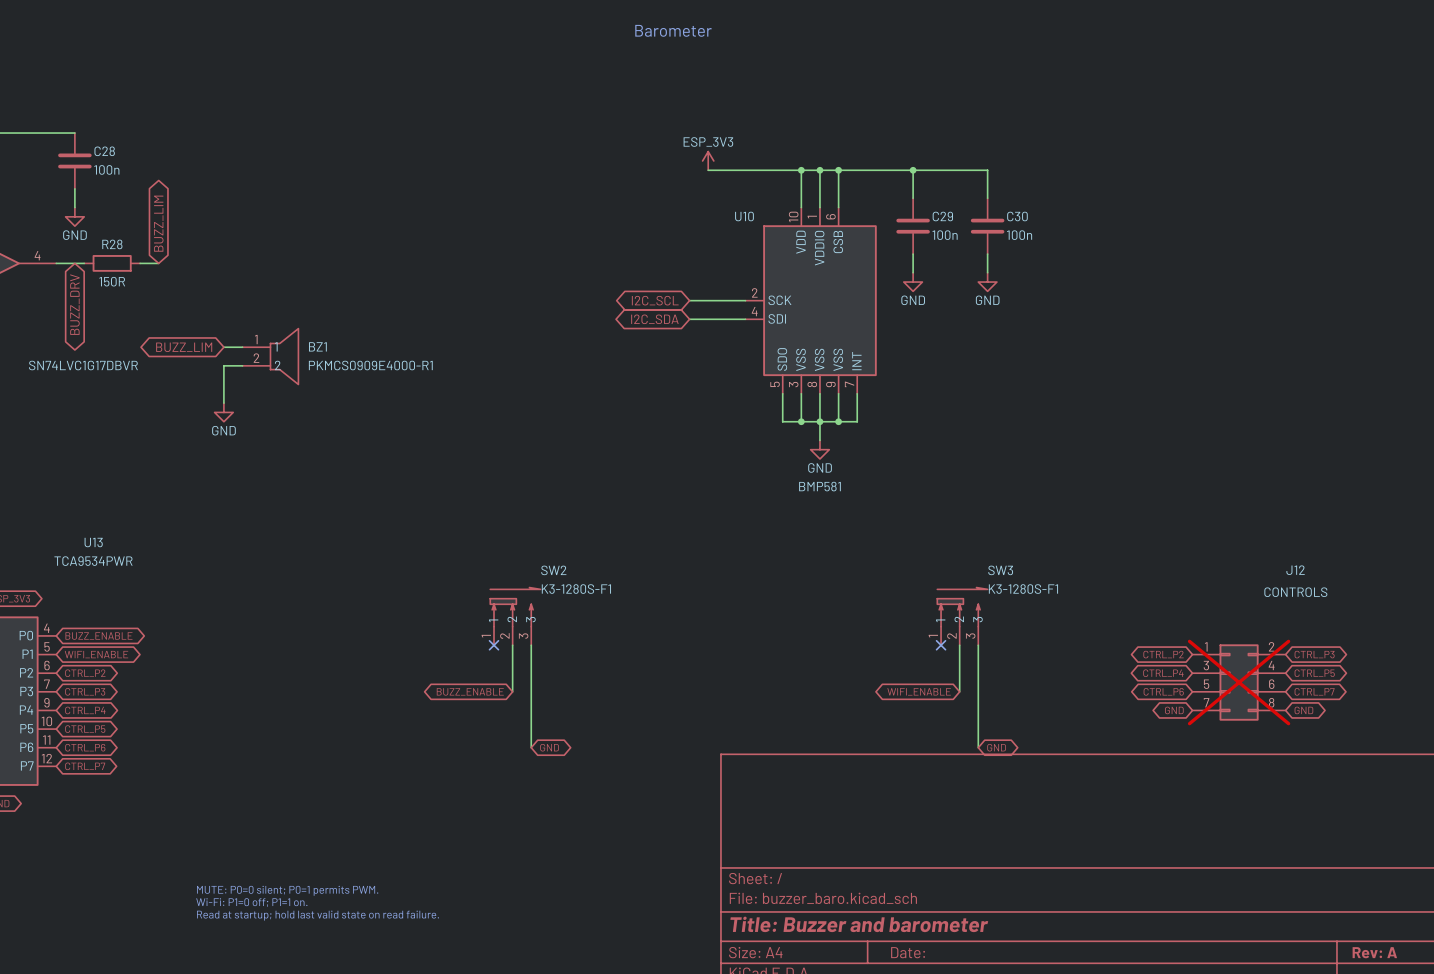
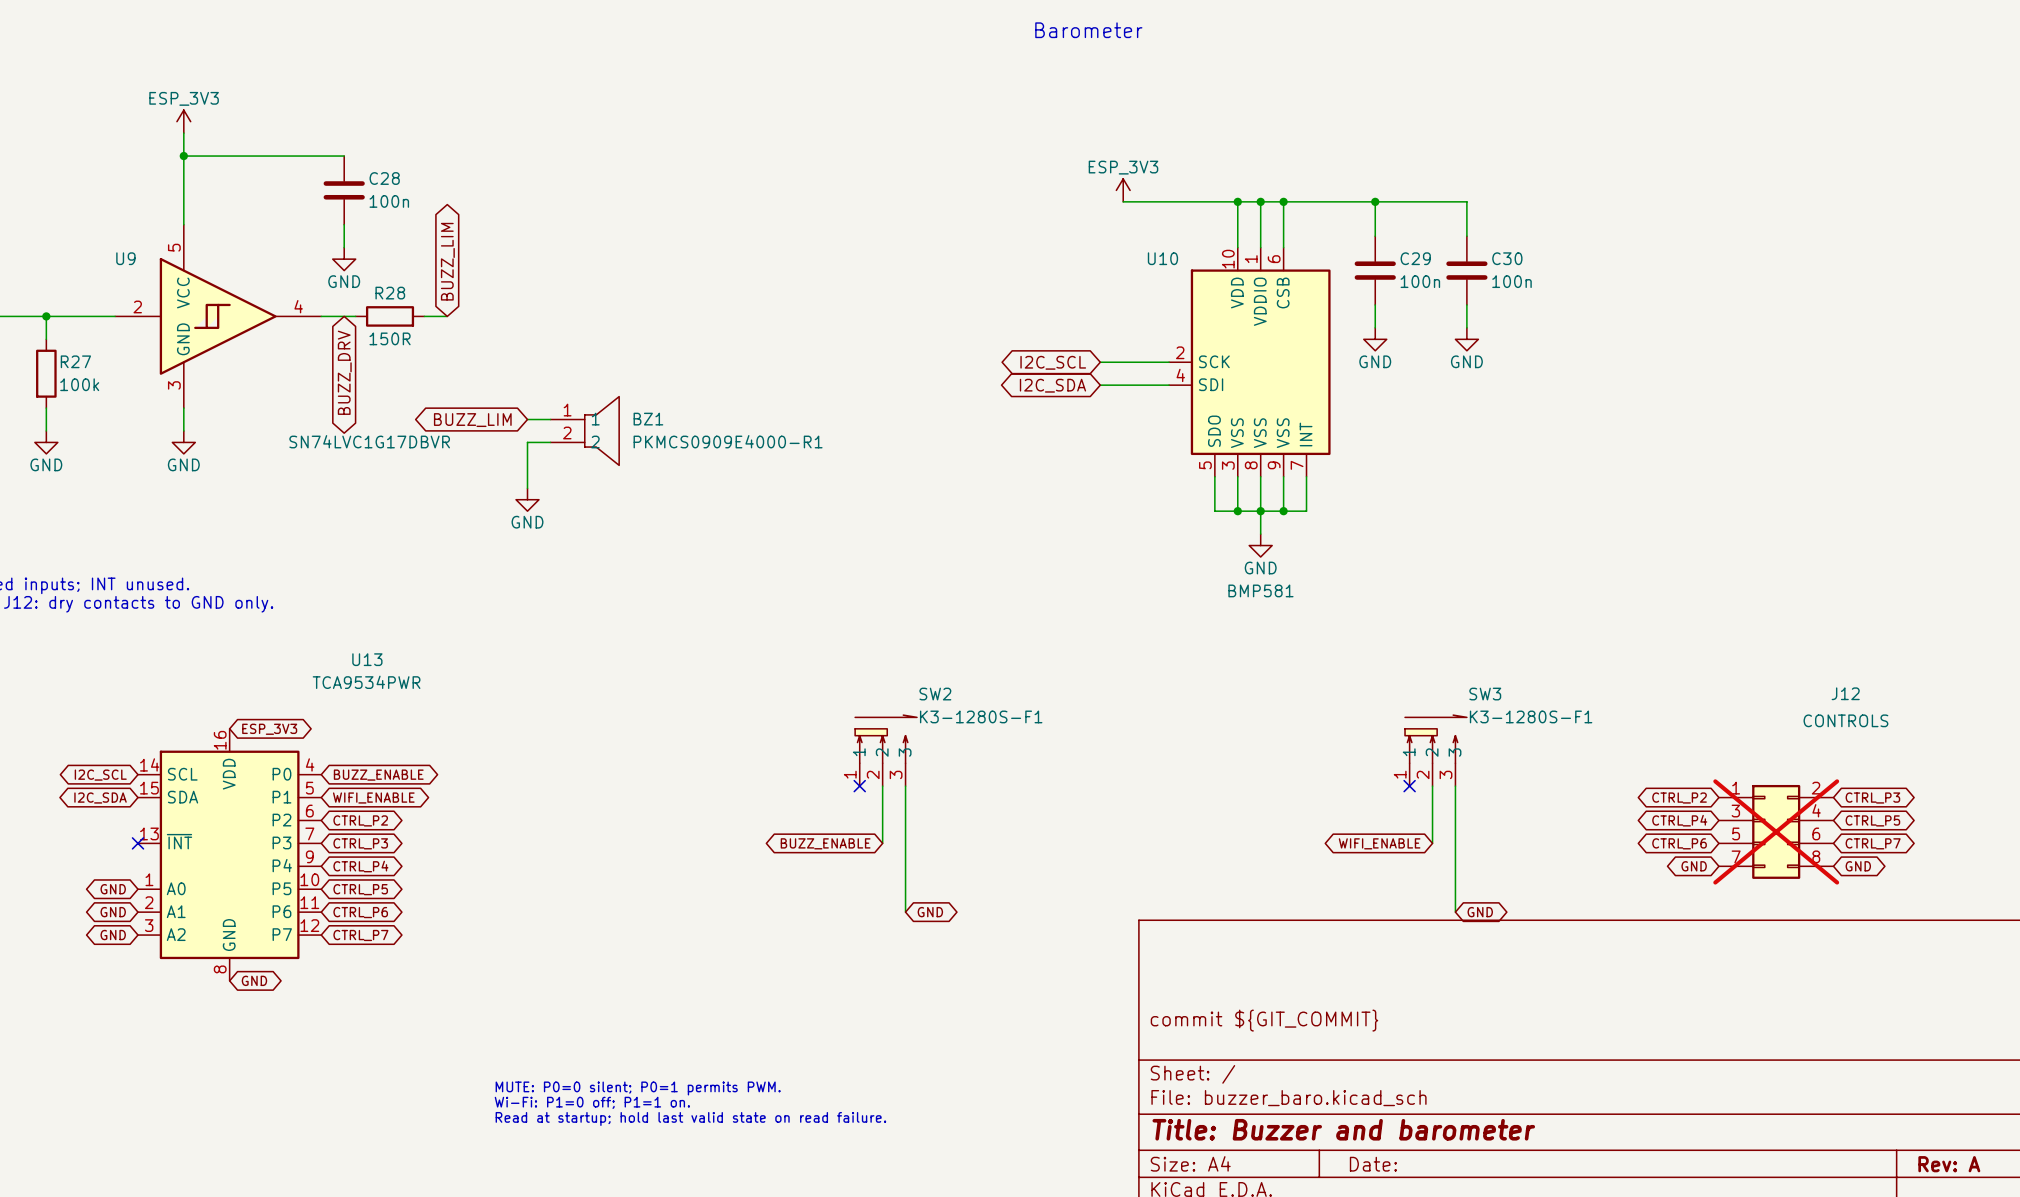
title block: none -> commit ${GIT_COMMIT} (1264, 1020)

